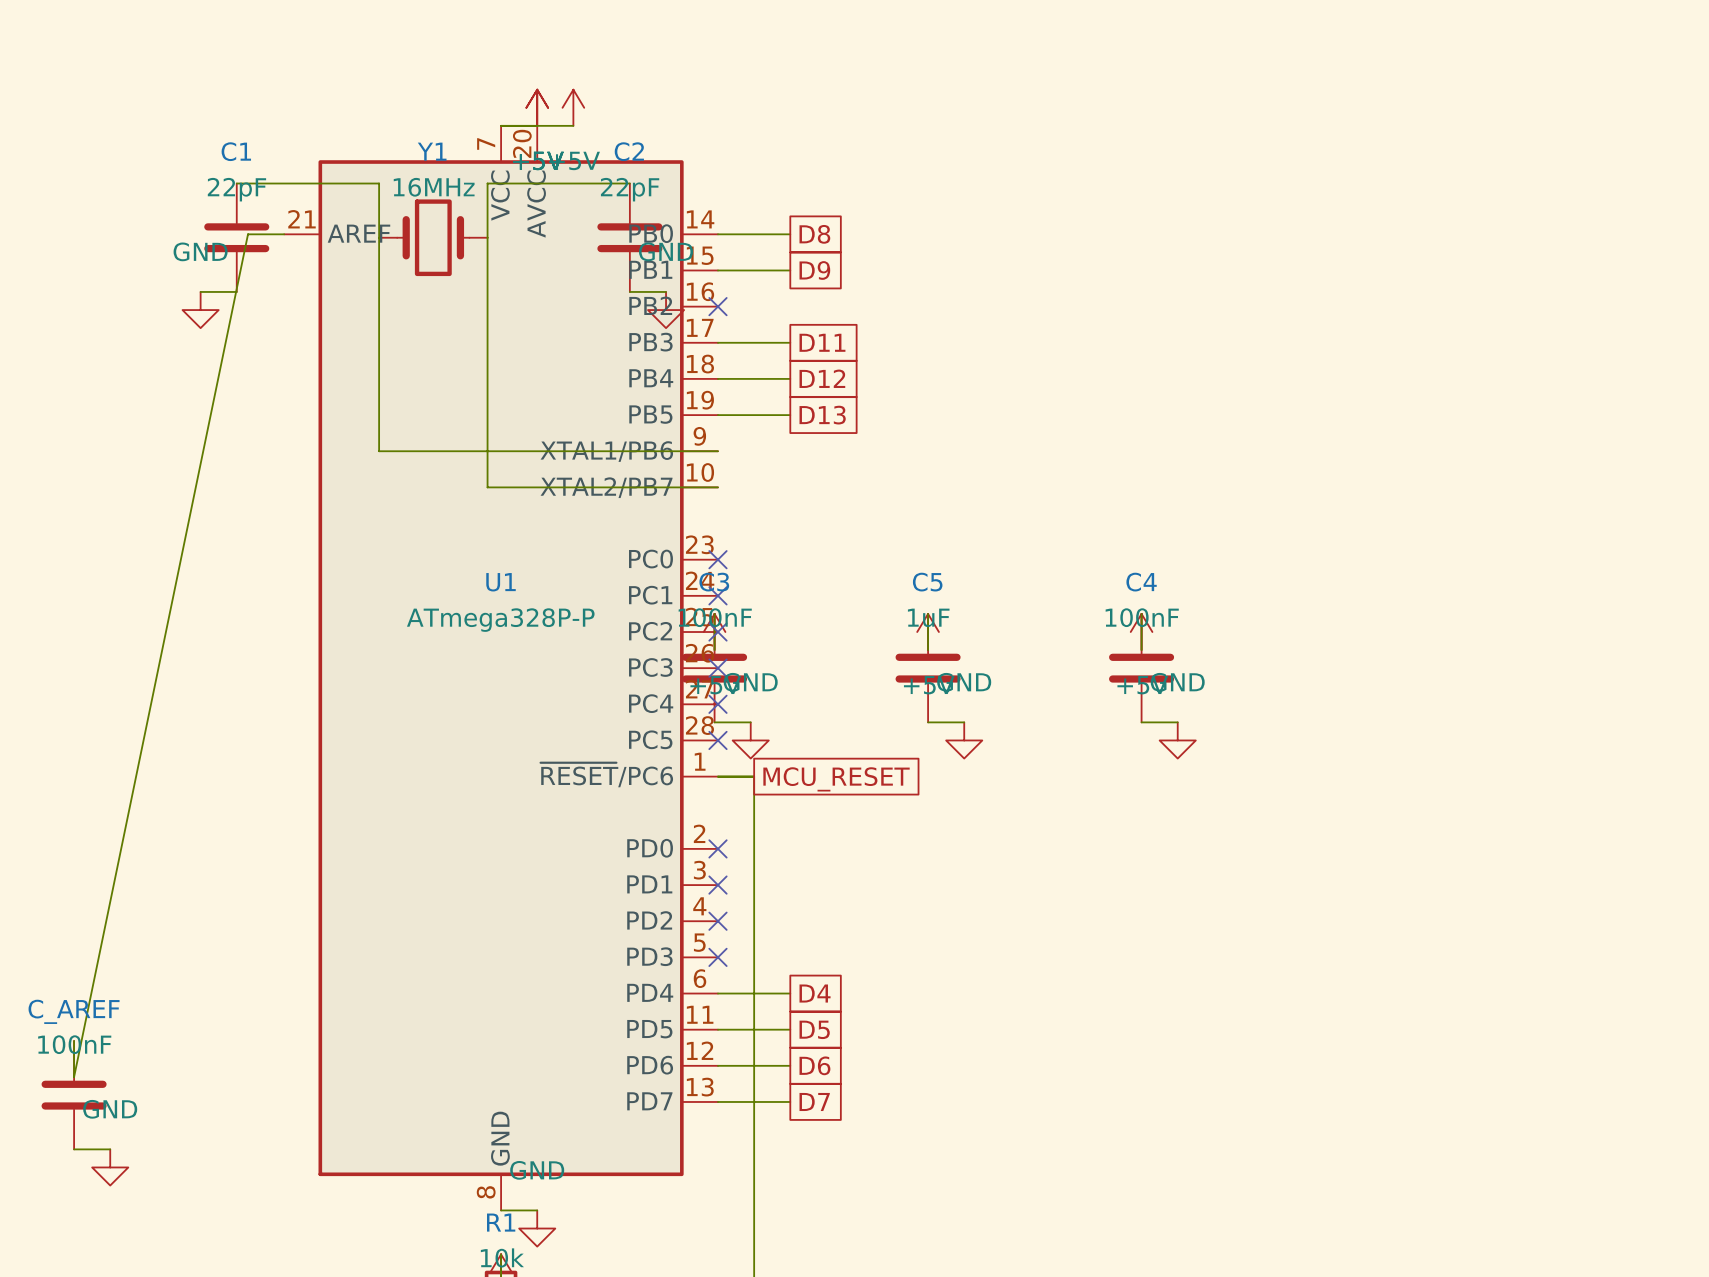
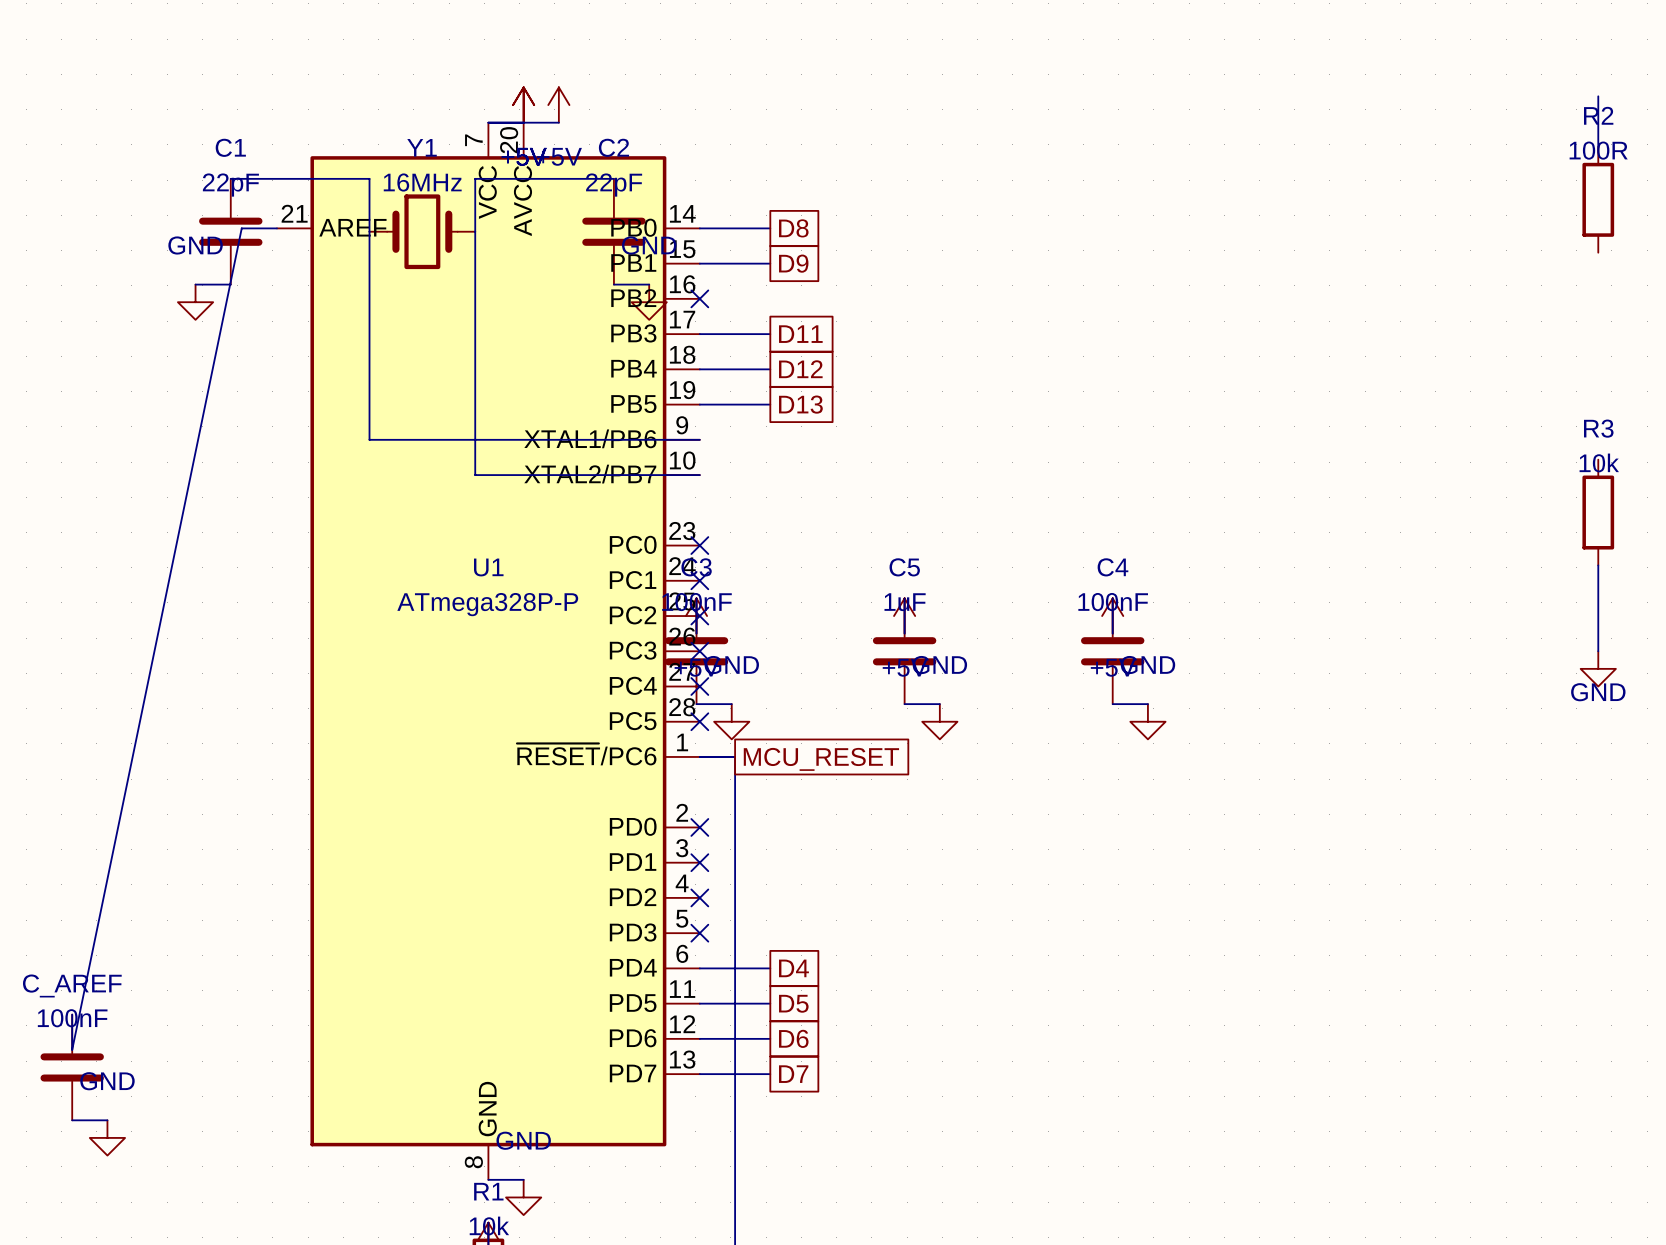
wire: none -> (1598, 96) (1598, 146)
R2: none -> 100R (1598, 199)
R3: none -> 10k (1598, 512)
wire: none -> (1598, 565) (1598, 651)
power symbol: none -> GND (1598, 668)

